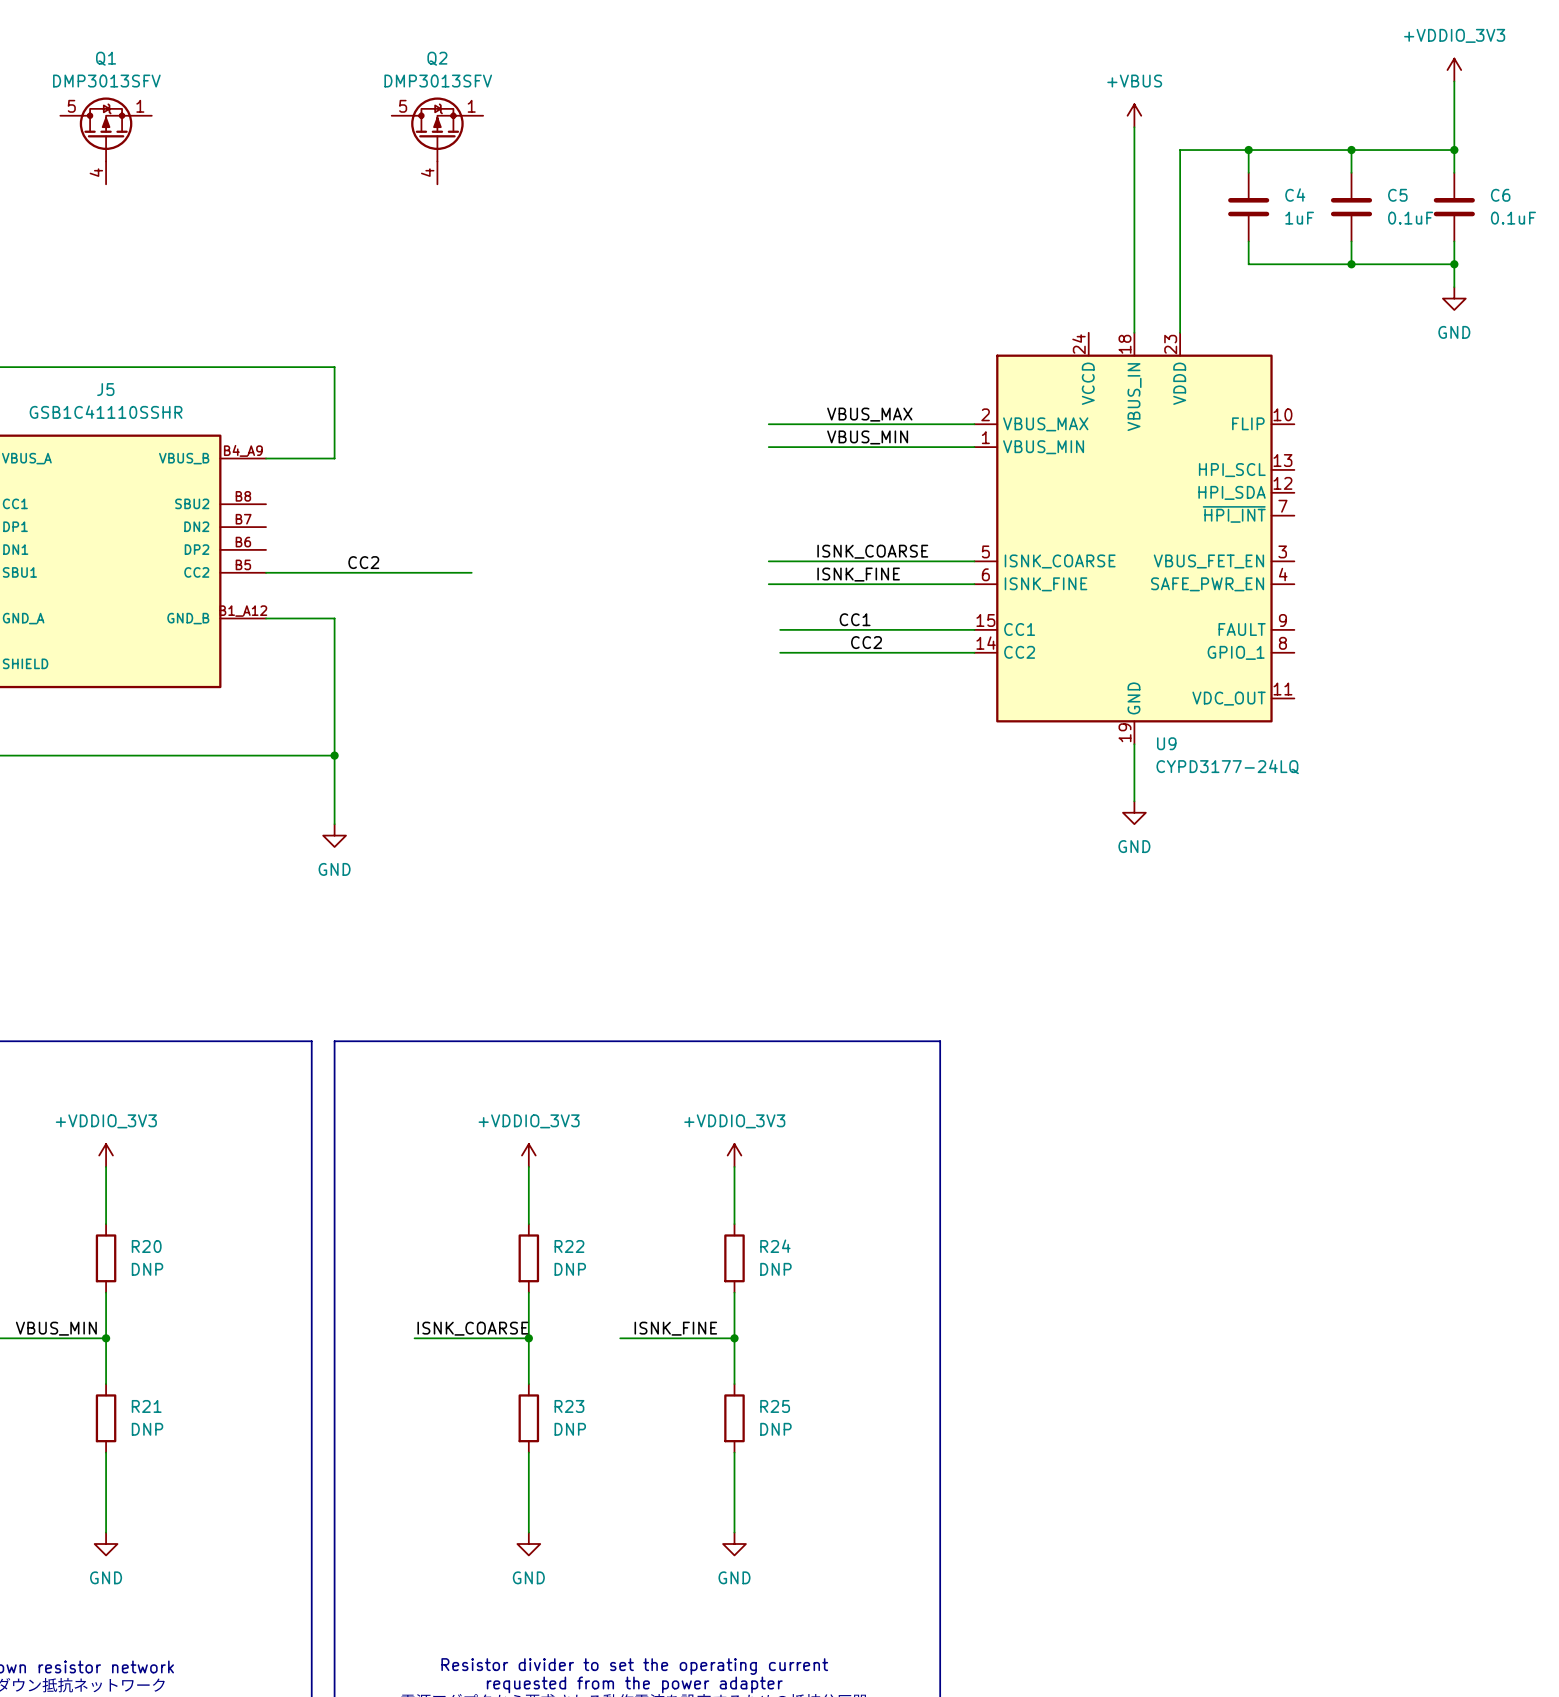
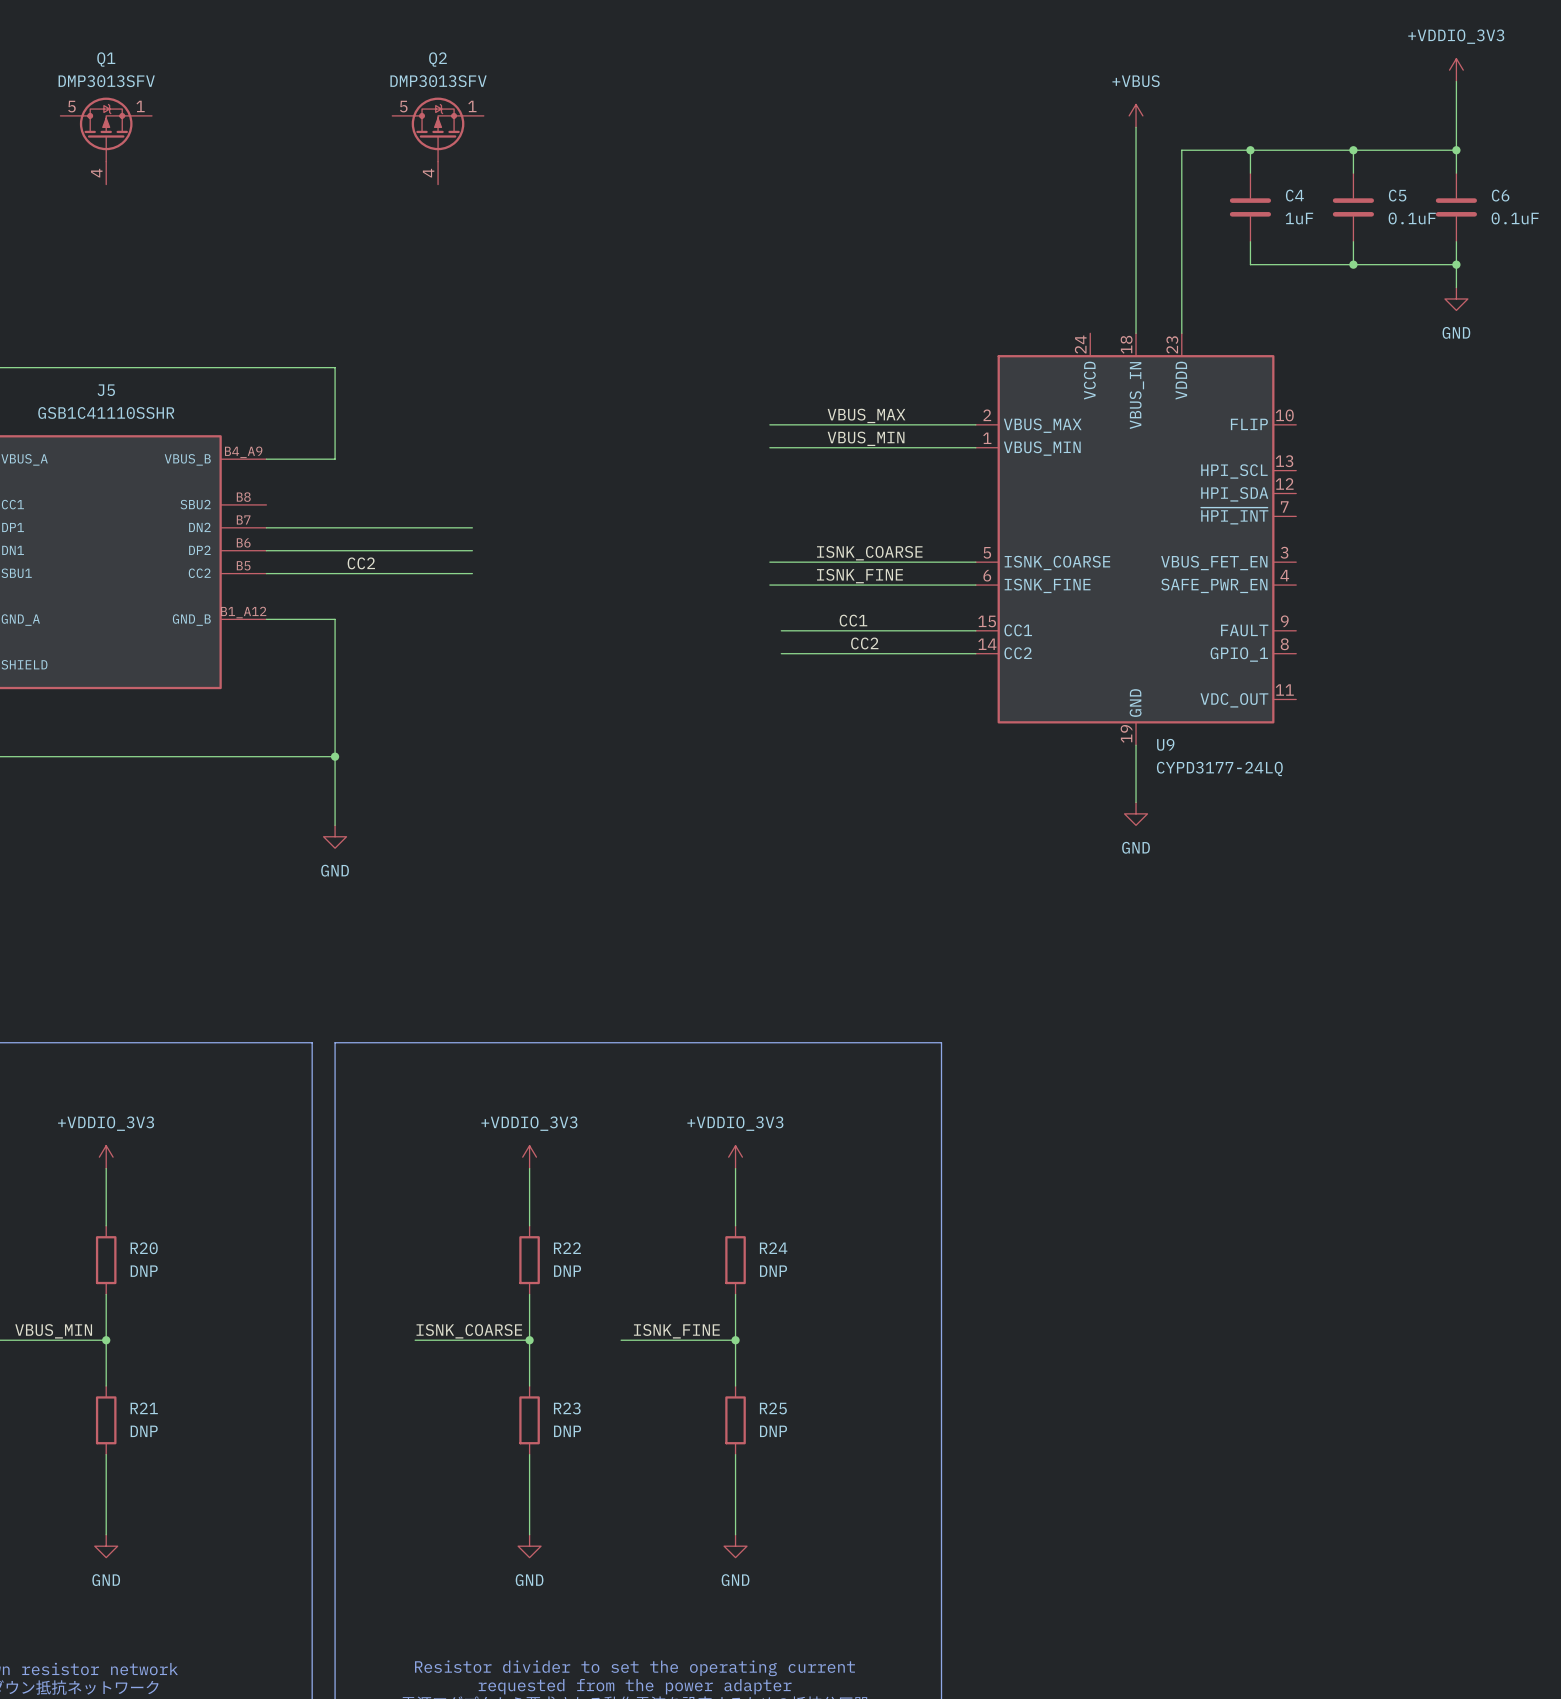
wire: none -> (266, 527) (472, 527)
wire: none -> (266, 550) (472, 550)

